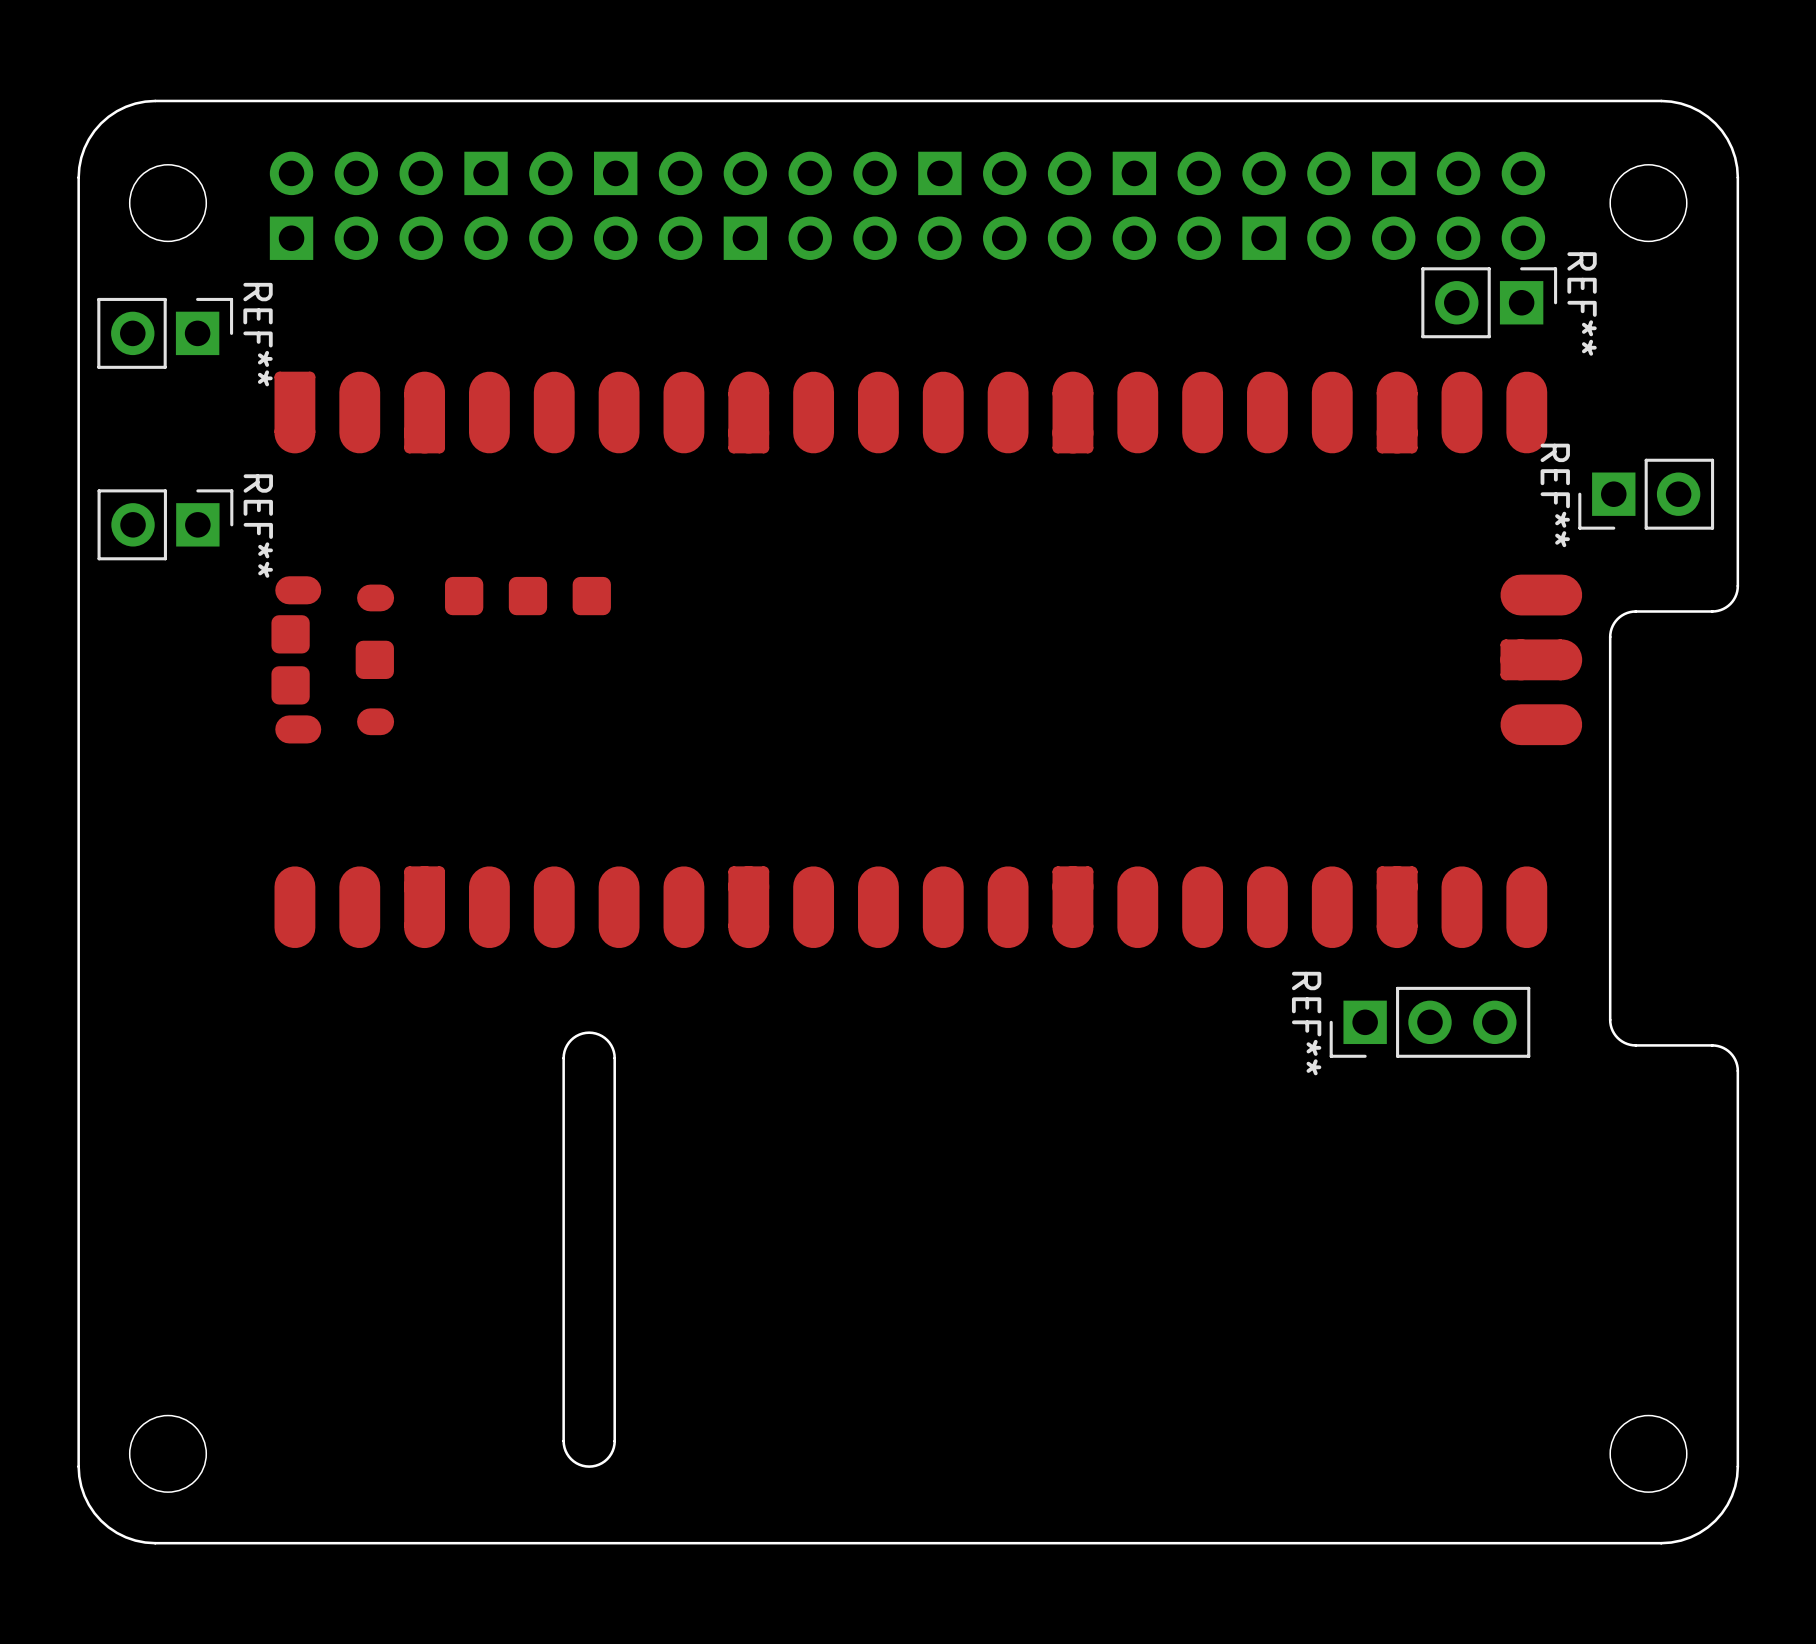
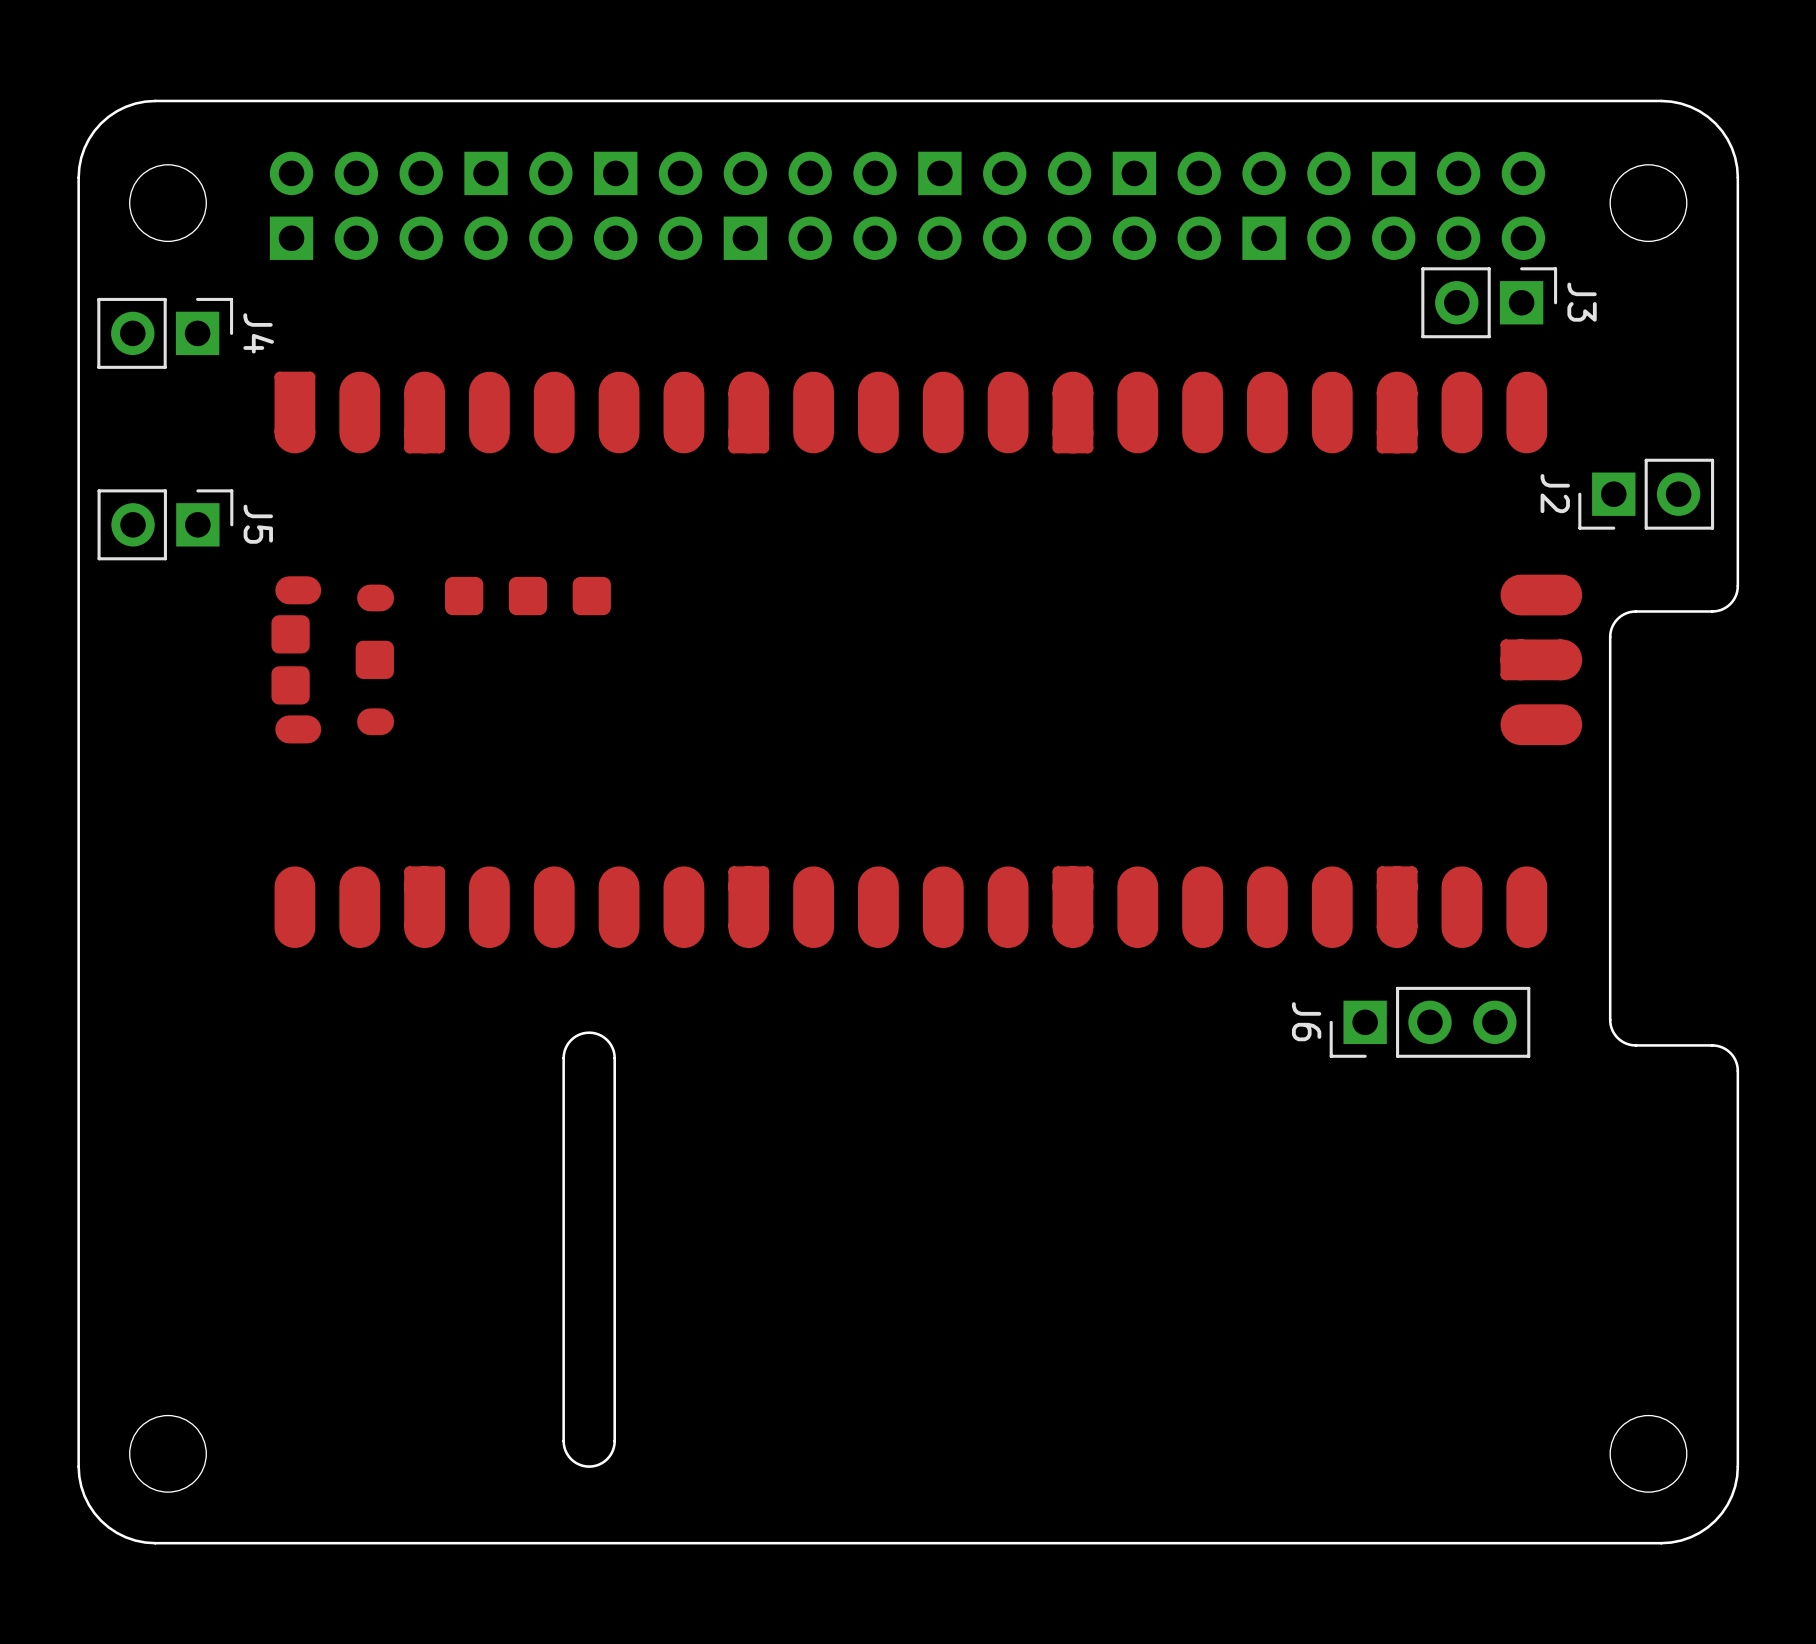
REF** name: REF** (1582, 303) -> J3 (1582, 302)
REF** name: REF** (258, 334) -> J4 (258, 333)
REF** name: REF** (1555, 495) -> J2 (1555, 493)
REF** name: REF** (258, 526) -> J5 (258, 524)
REF** name: REF** (1306, 1023) -> J6 (1306, 1021)

